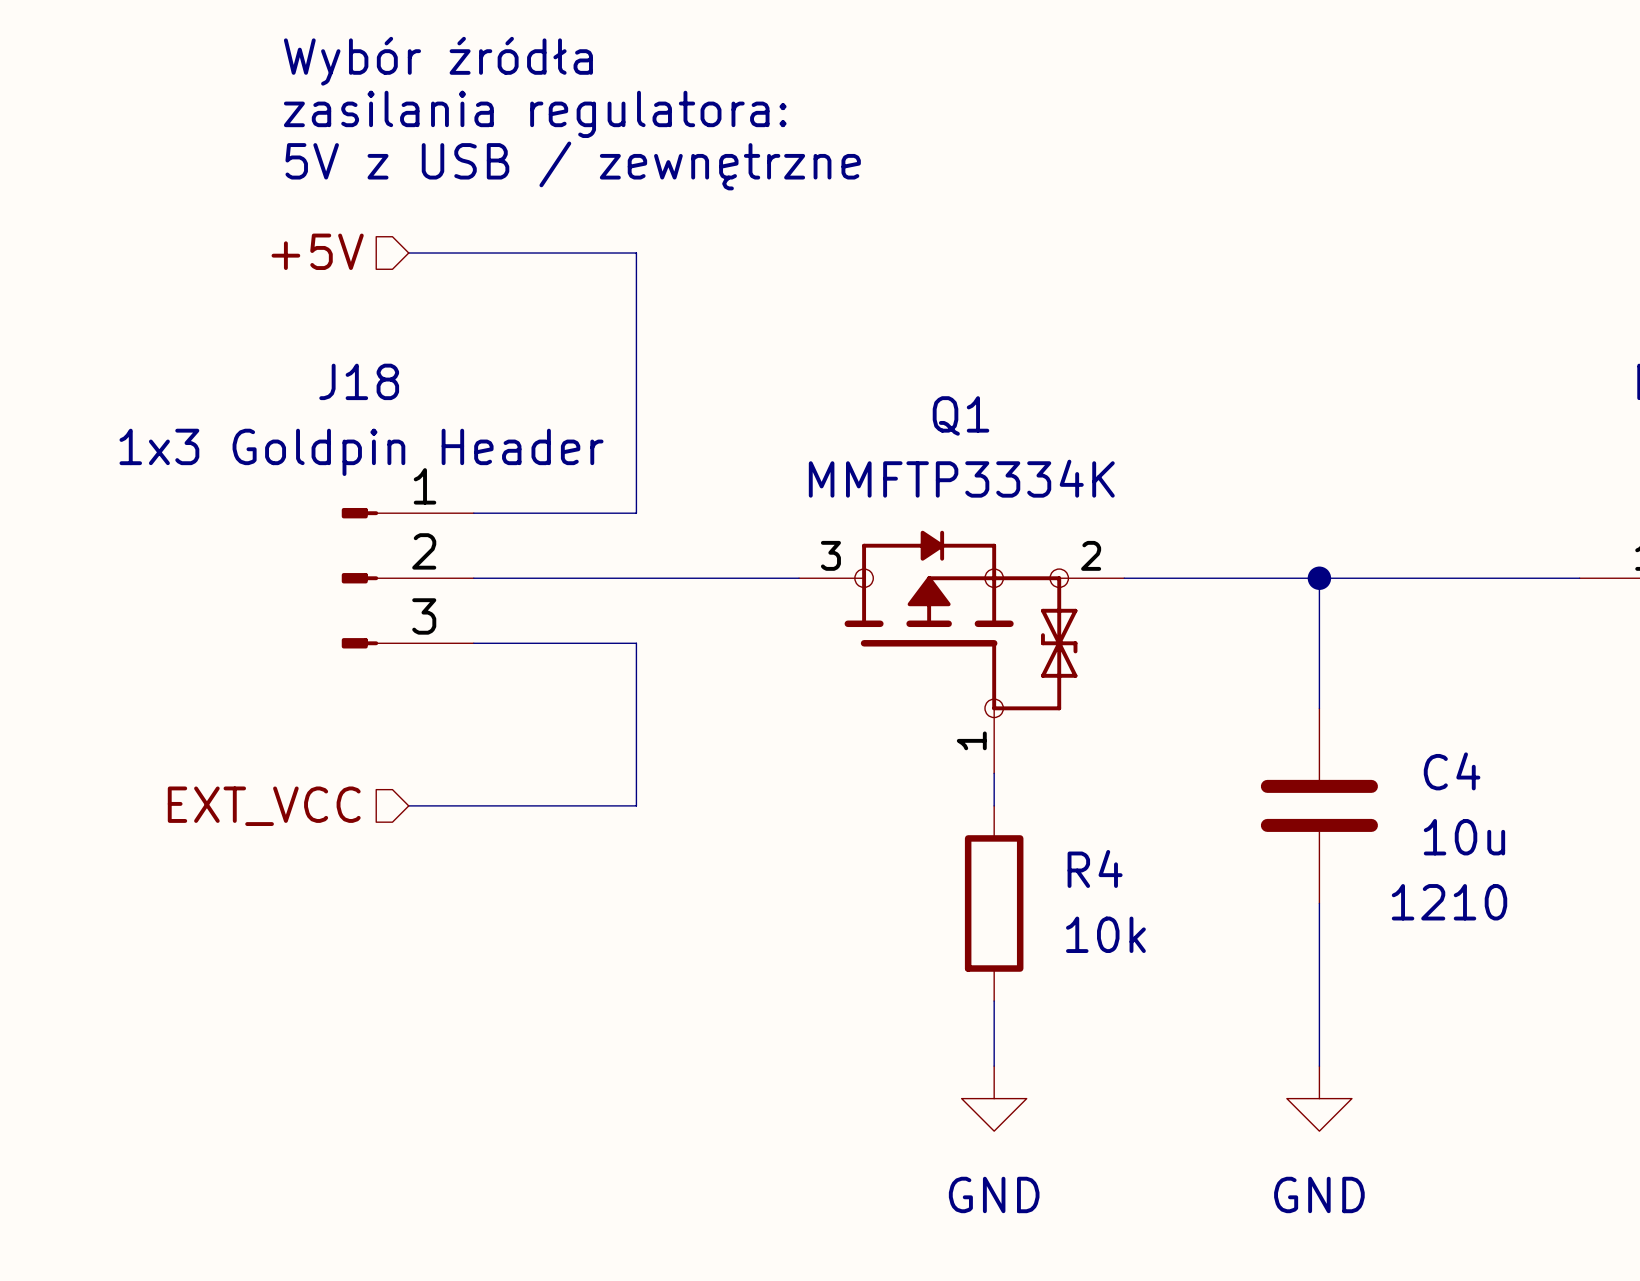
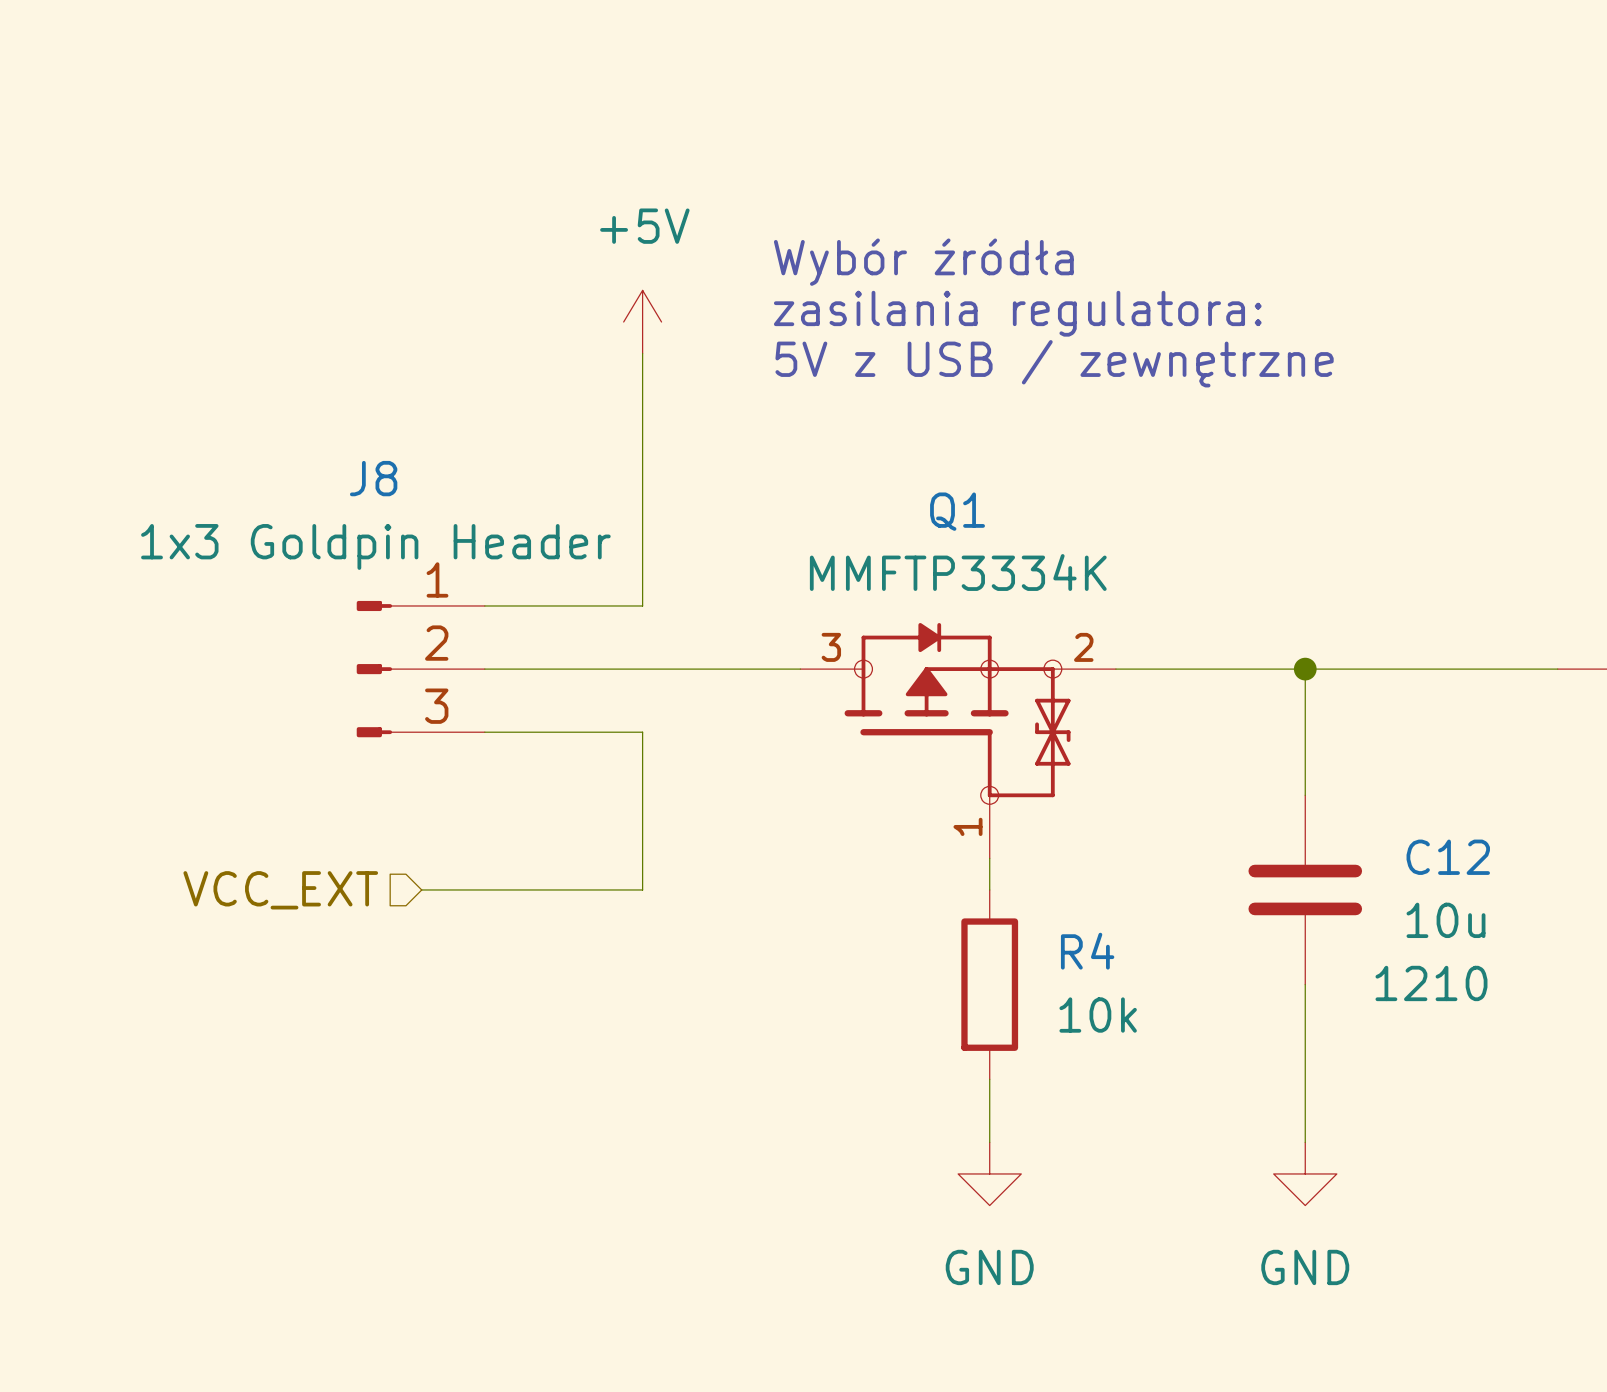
text position: Wybór źródła (438, 61) -> Wybór źródła (923, 262)
text position: zasilania regulatora: (535, 114) -> zasilania regulatora: (1017, 313)
text position: 5V z USB / zewnętrzne (573, 165) -> 5V z USB / zewnętrzne (1054, 363)
power symbol: none -> +5V (642, 321)
hierarchical label: +5V (317, 251) -> none
wire: (408, 253) (636, 253) -> none
J18 name: J18 (359, 381) -> J8 (373, 478)
C4 name: C4 (1452, 771) -> C12 (1448, 857)
hierarchical label: EXT_VCC (264, 806) -> VCC_EXT (280, 890)

